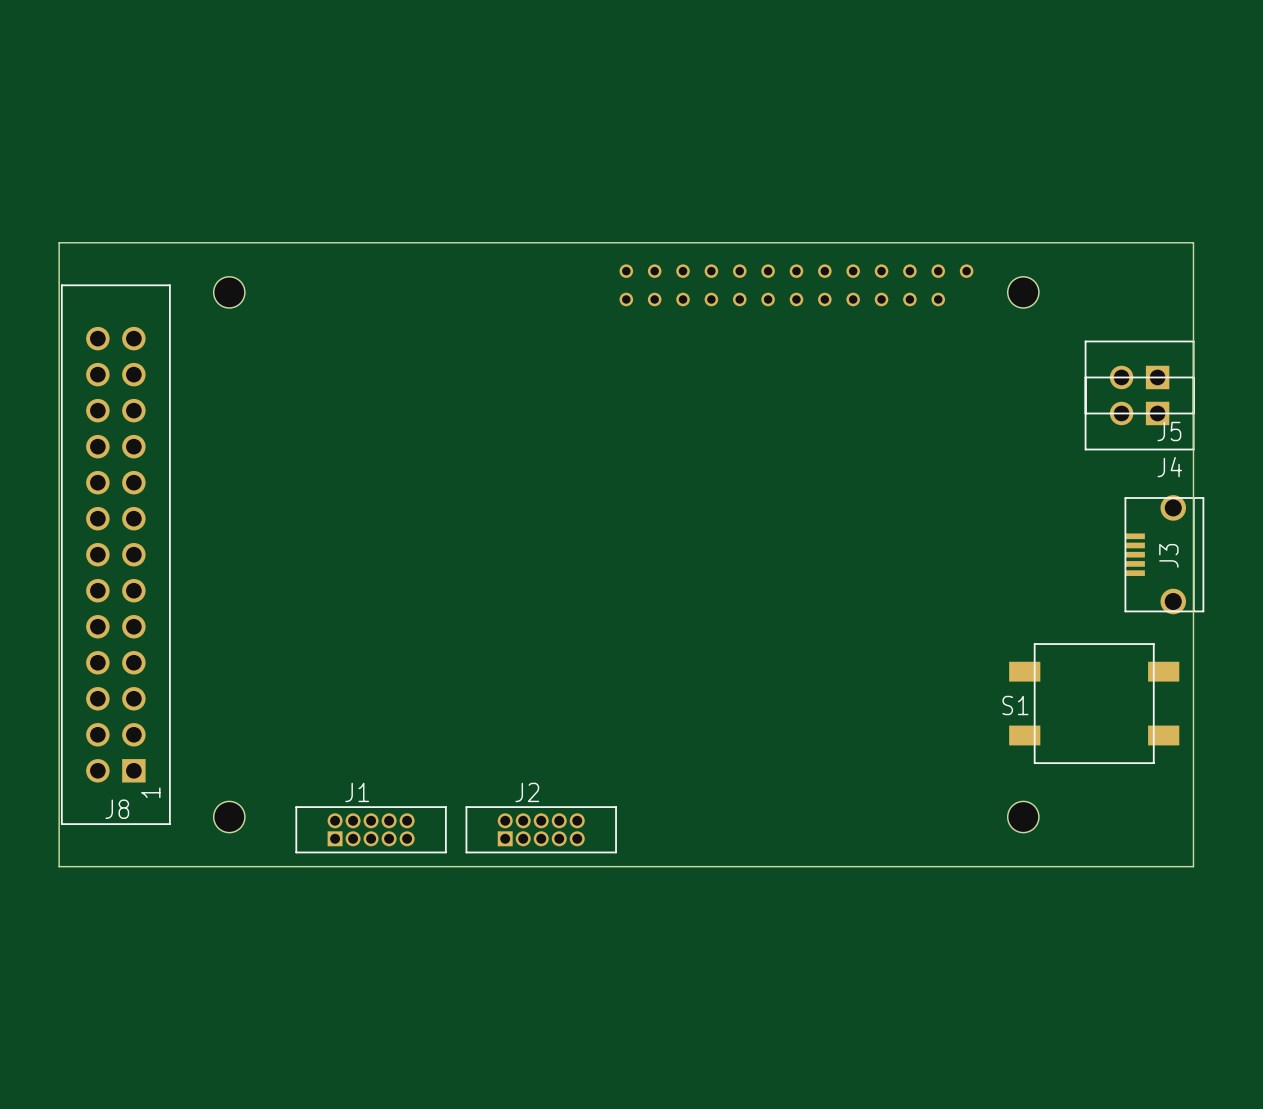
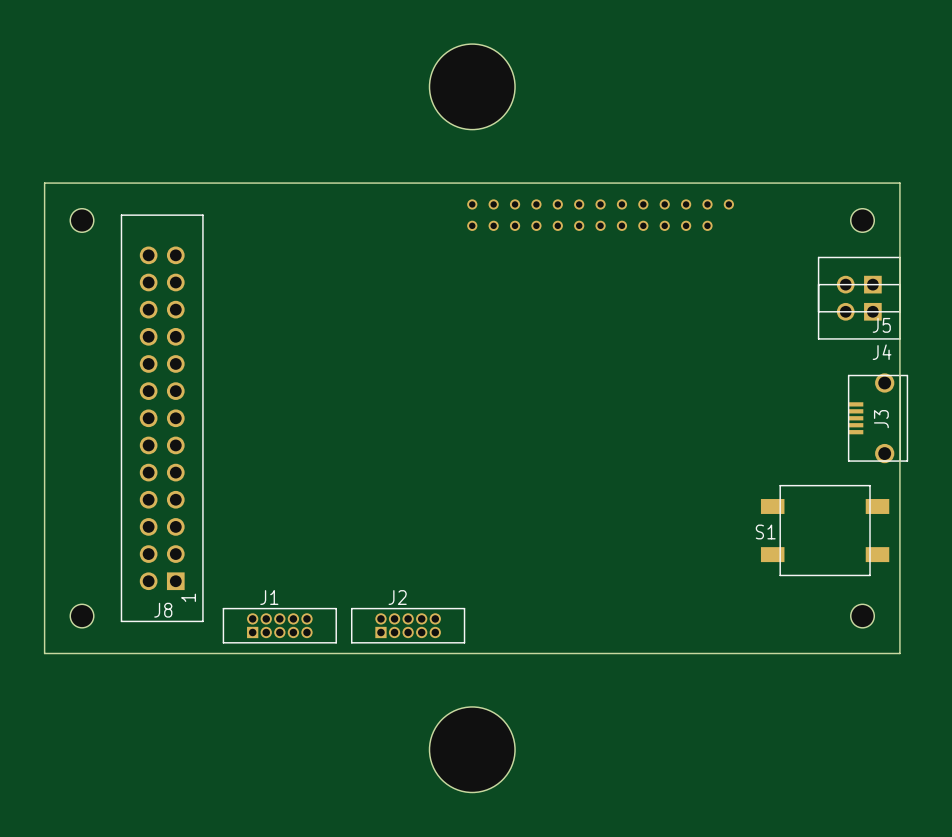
hole: none -> (472, 86)
hole position: (229, 292) -> (82, 220)
hole position: (1023, 292) -> (862, 220)
J8 position: (115, 554) -> (162, 418)
hole position: (229, 817) -> (82, 616)
hole position: (1023, 817) -> (862, 616)
hole: none -> (472, 749)

